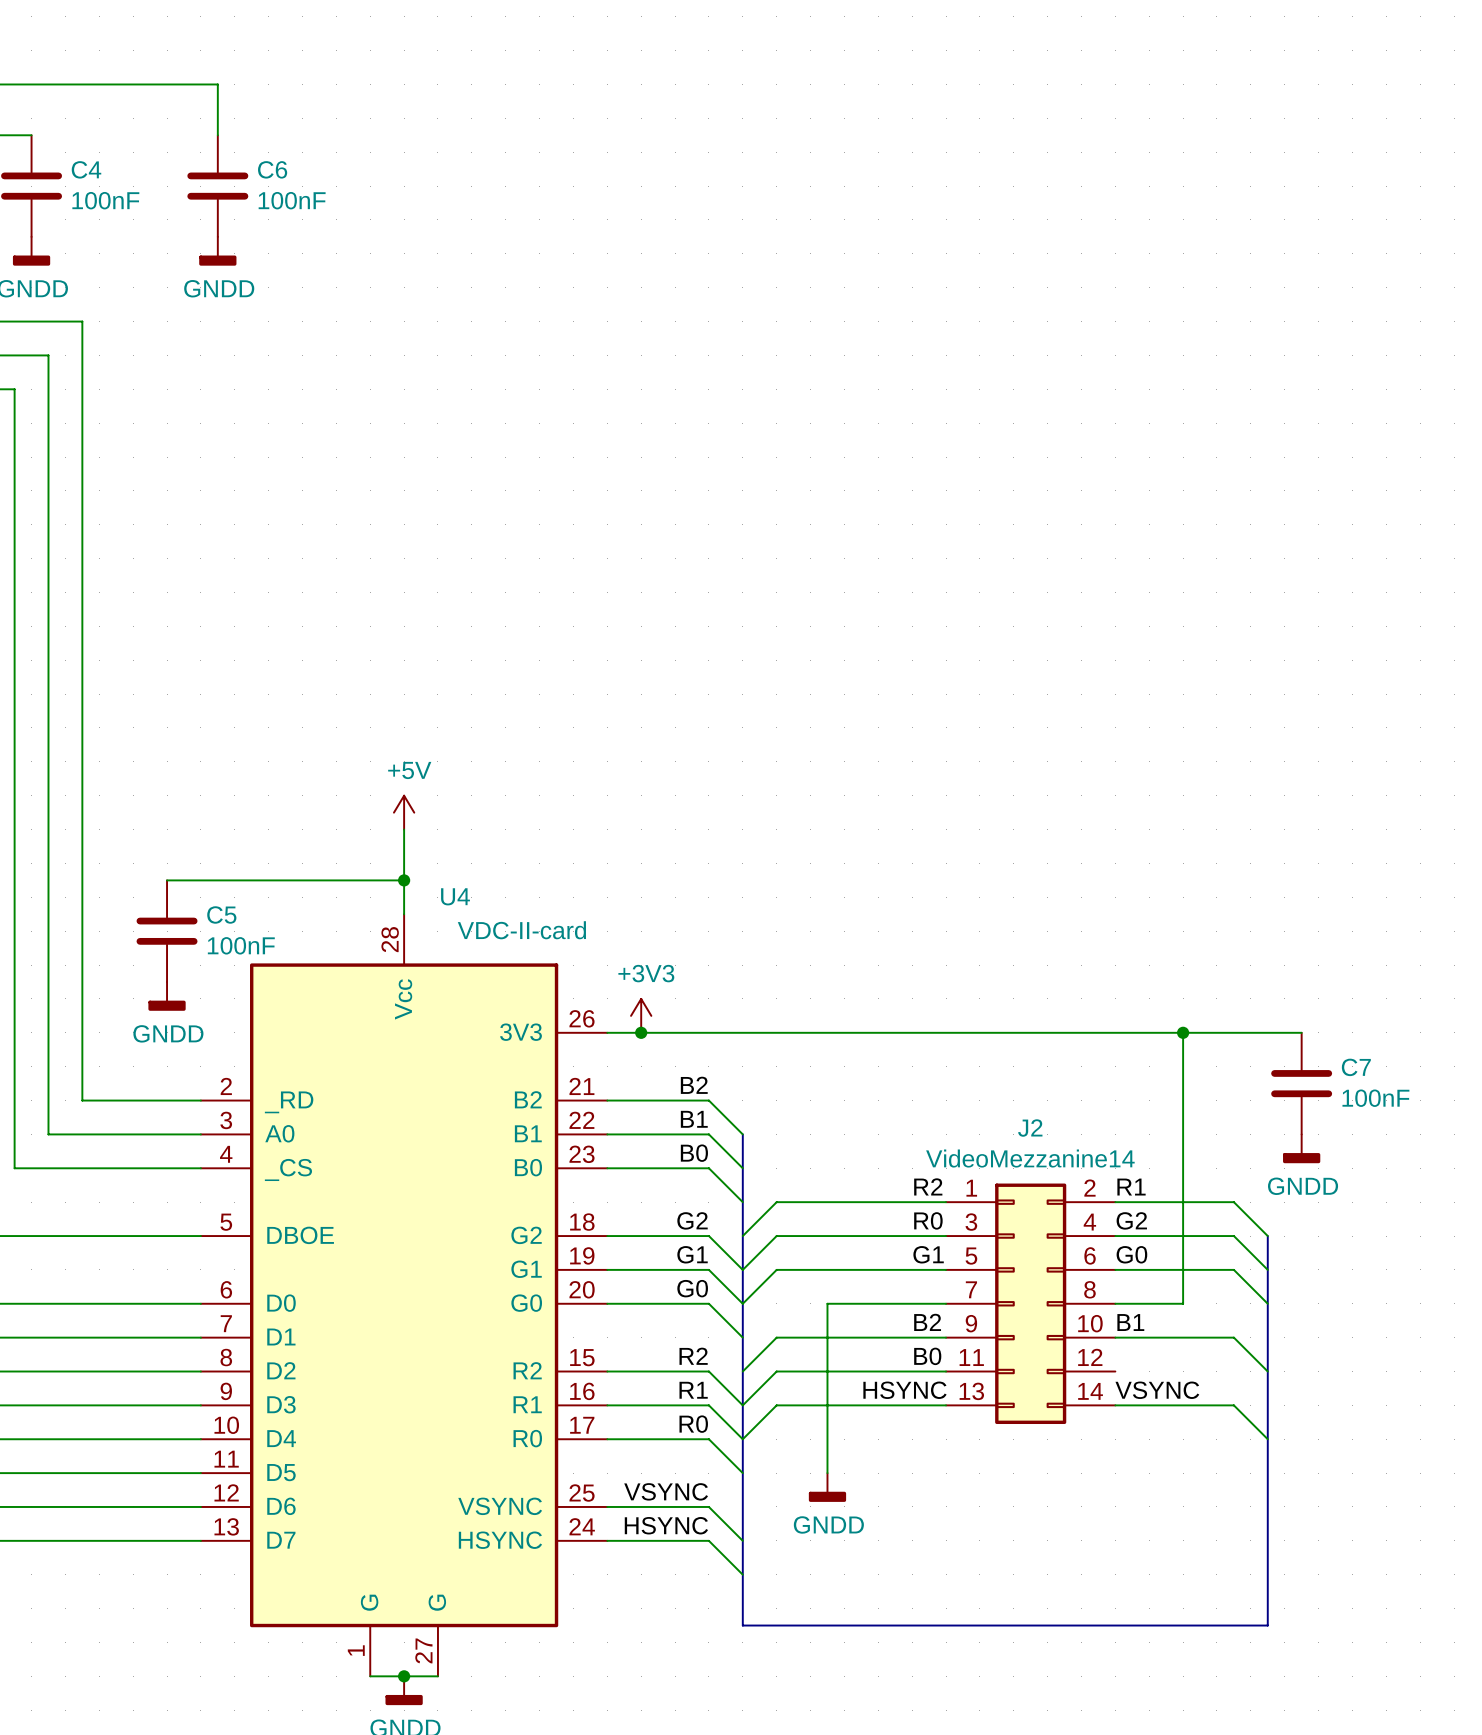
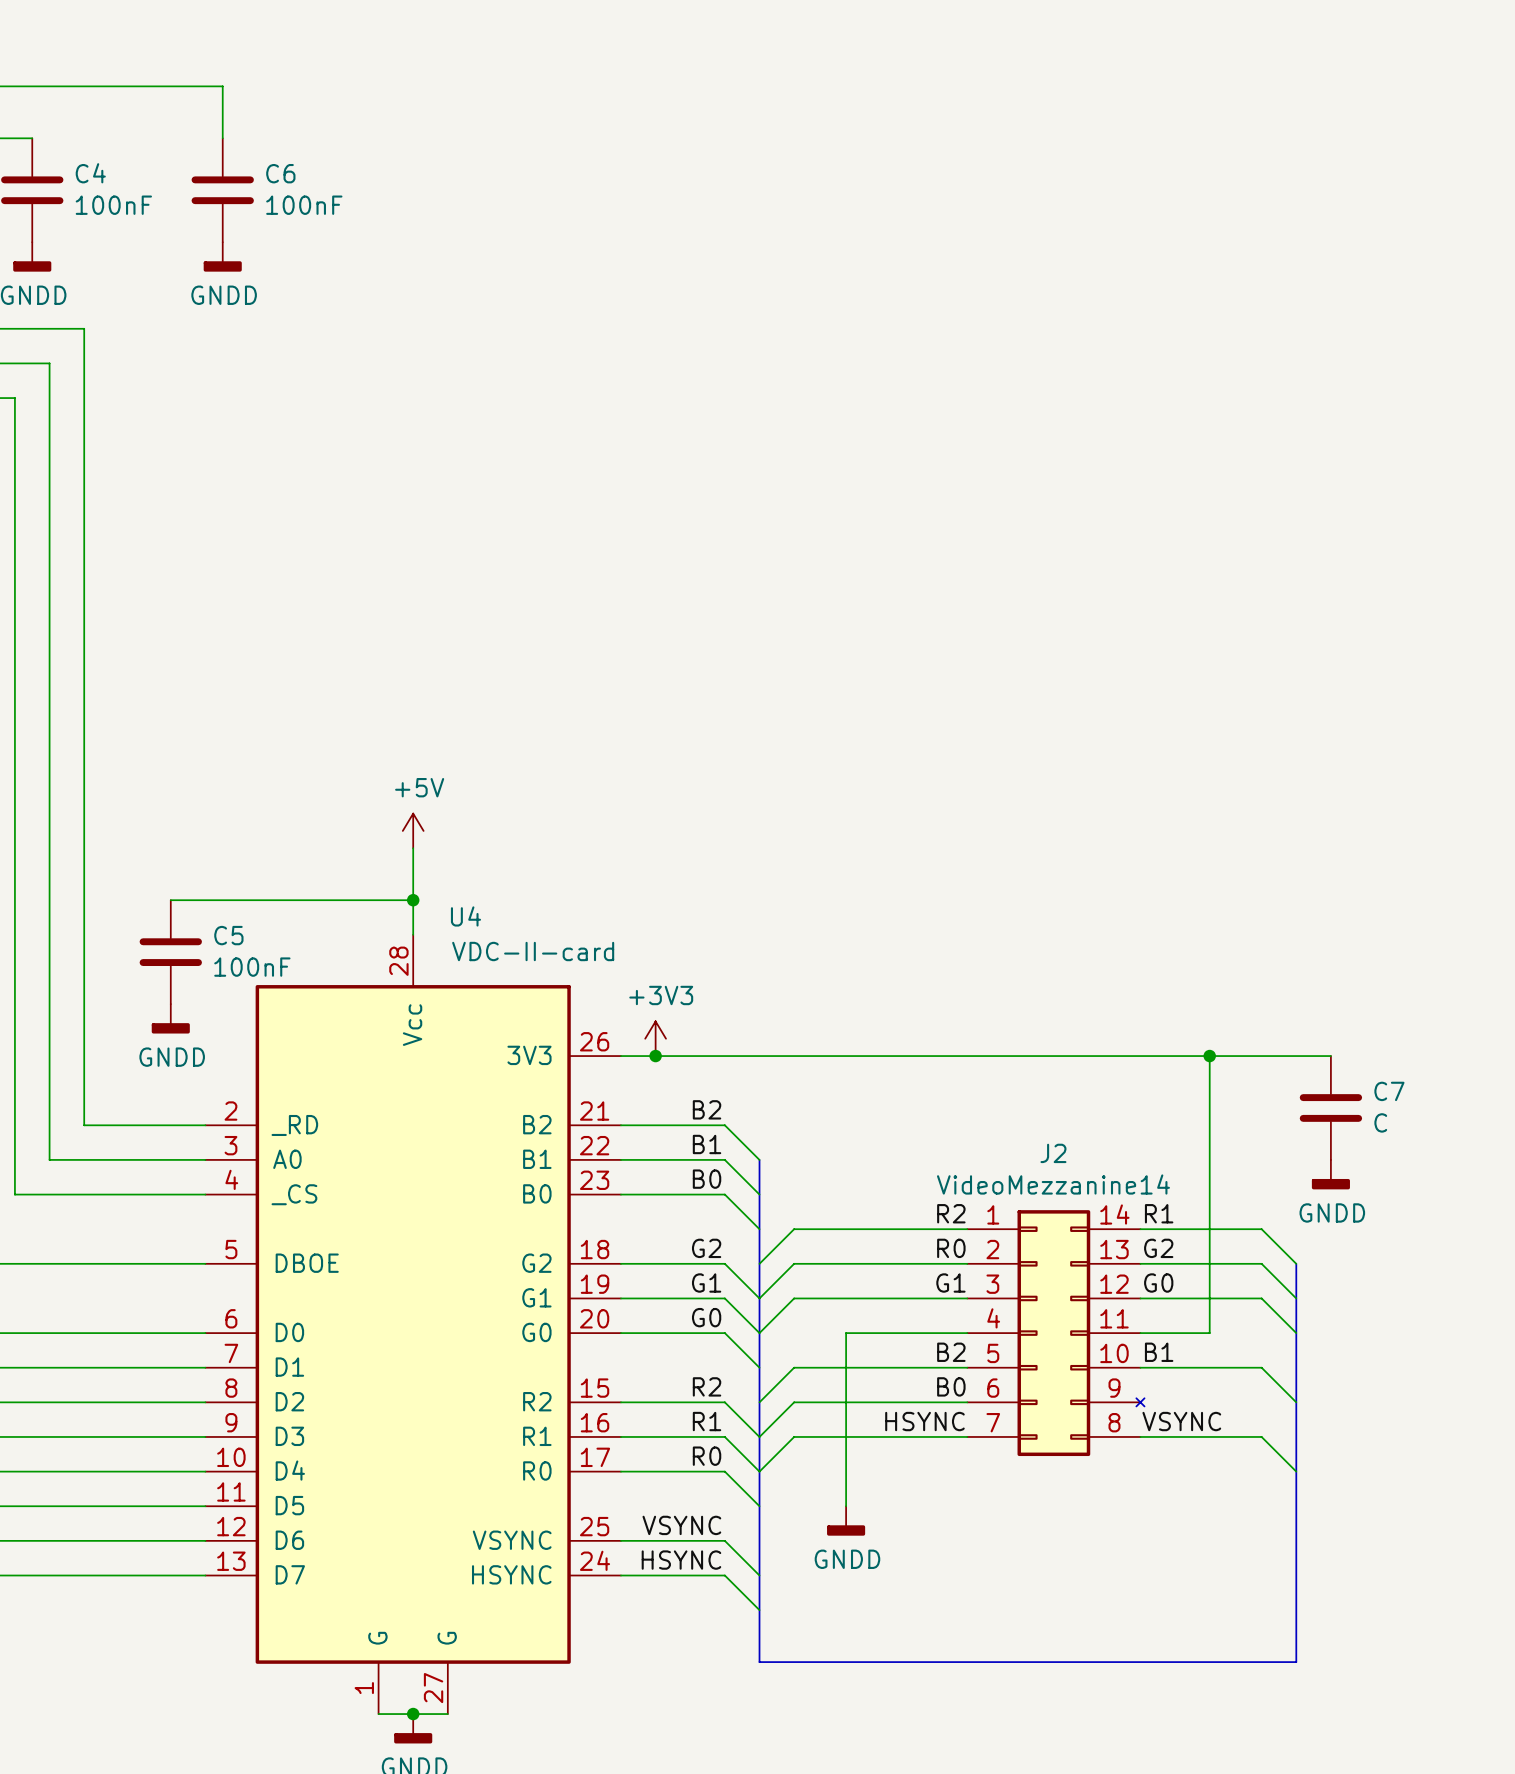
C7 value: 100nF (1375, 1098) -> C (1380, 1122)
J2 symbol: [946, 1183, 1116, 1425] -> [967, 1210, 1145, 1457]

